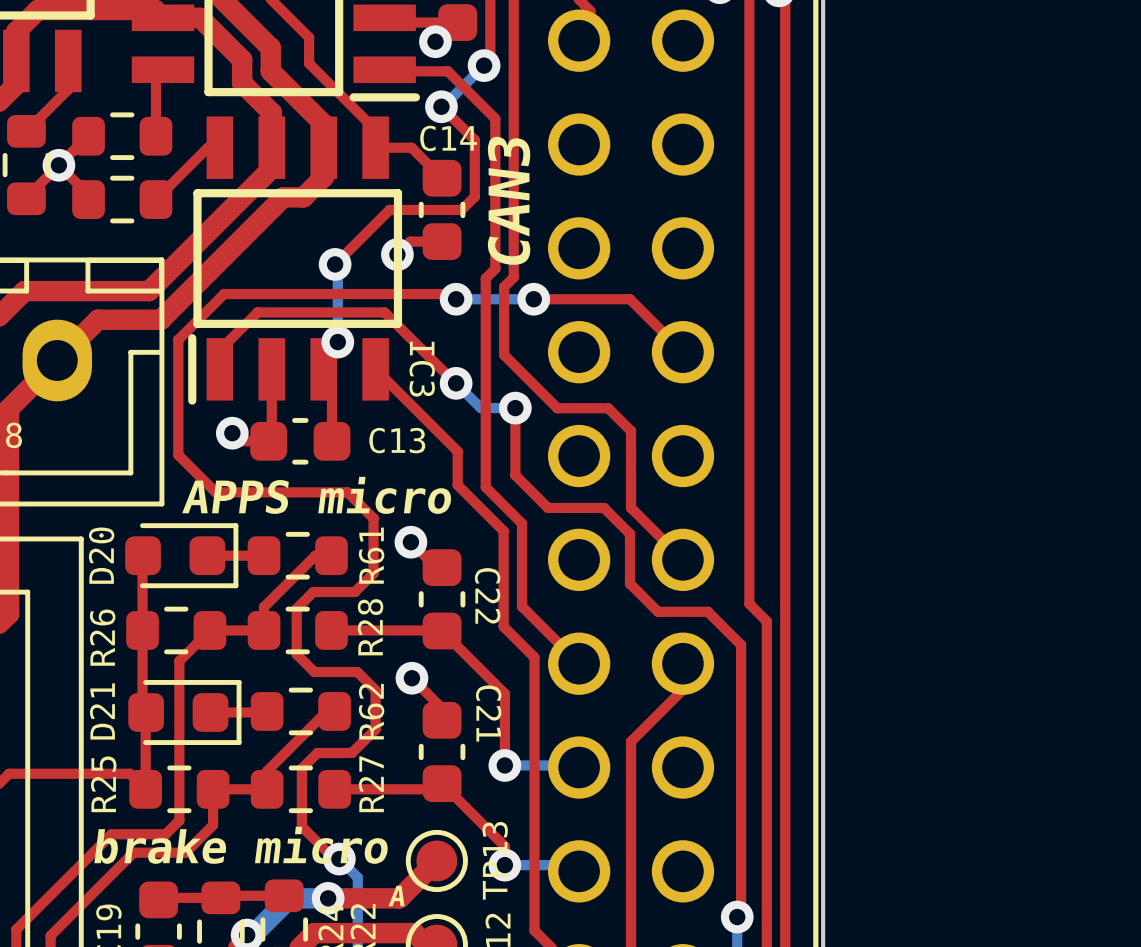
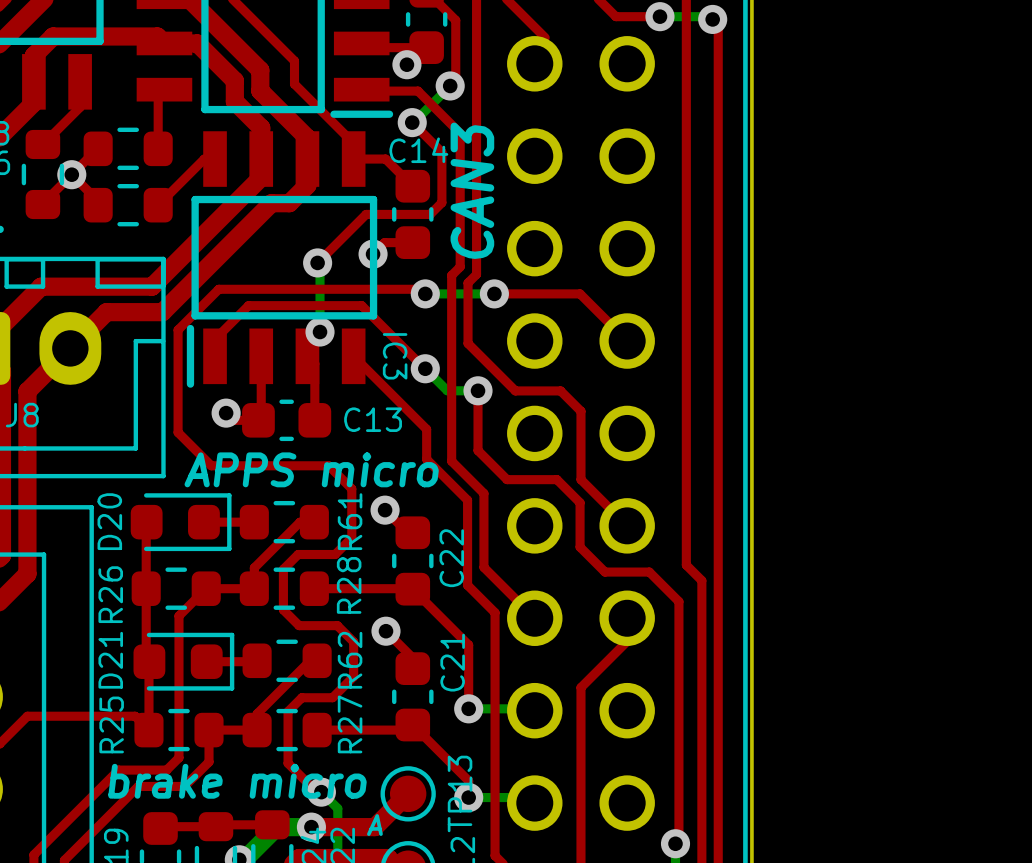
C22 name rotation: 0° (487, 595) -> 180° (451, 558)
C21 name rotation: 0° (488, 713) -> 180° (452, 662)

